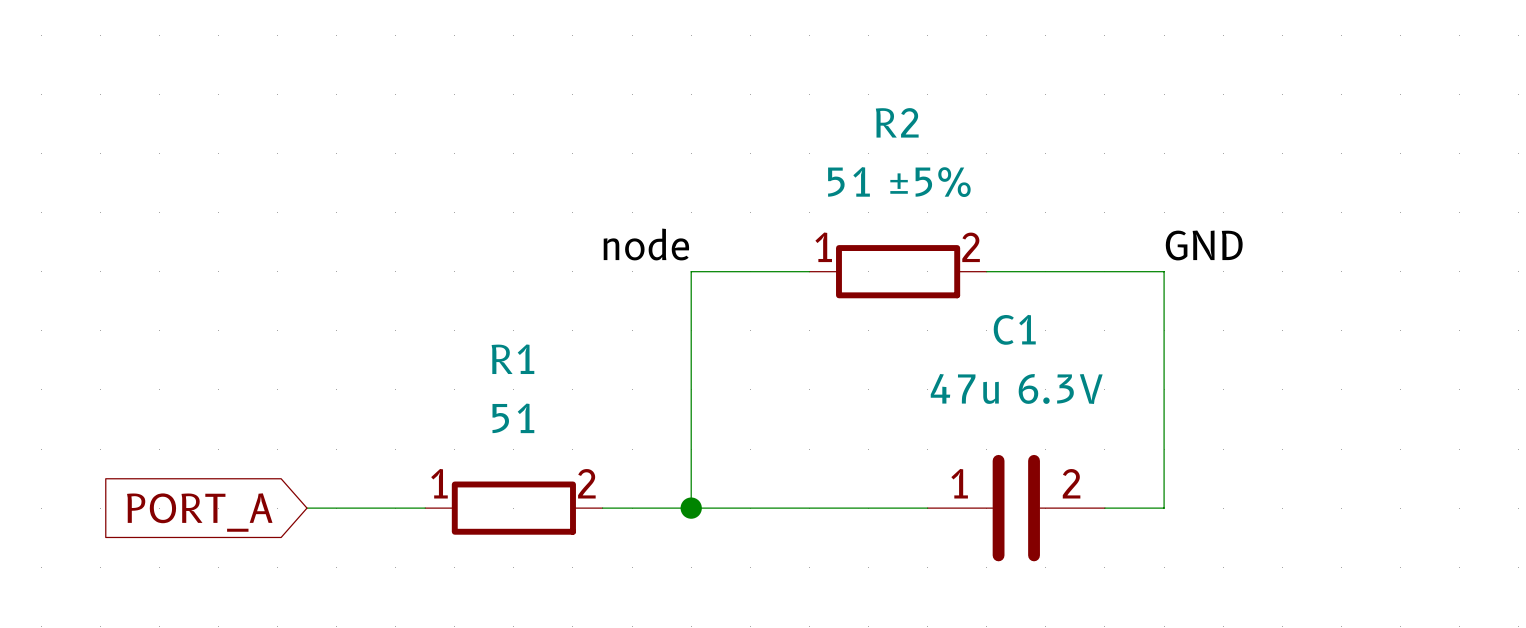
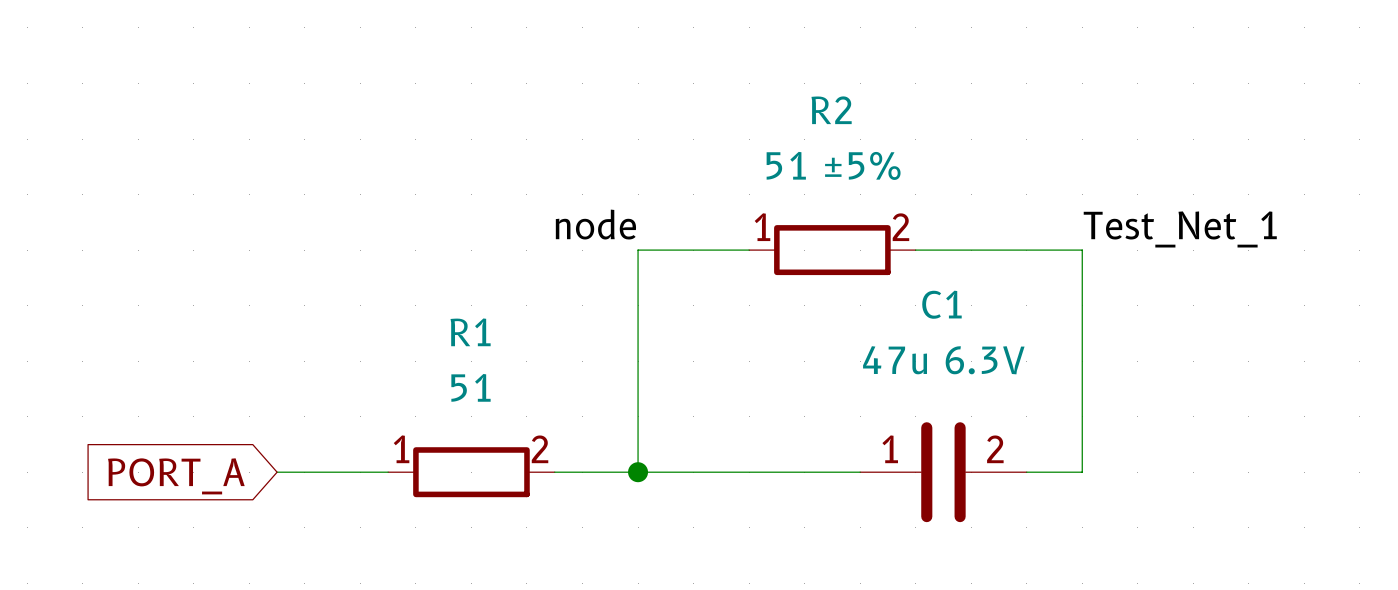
label: GND (1204, 245) -> Test_Net_1 (1180, 229)

